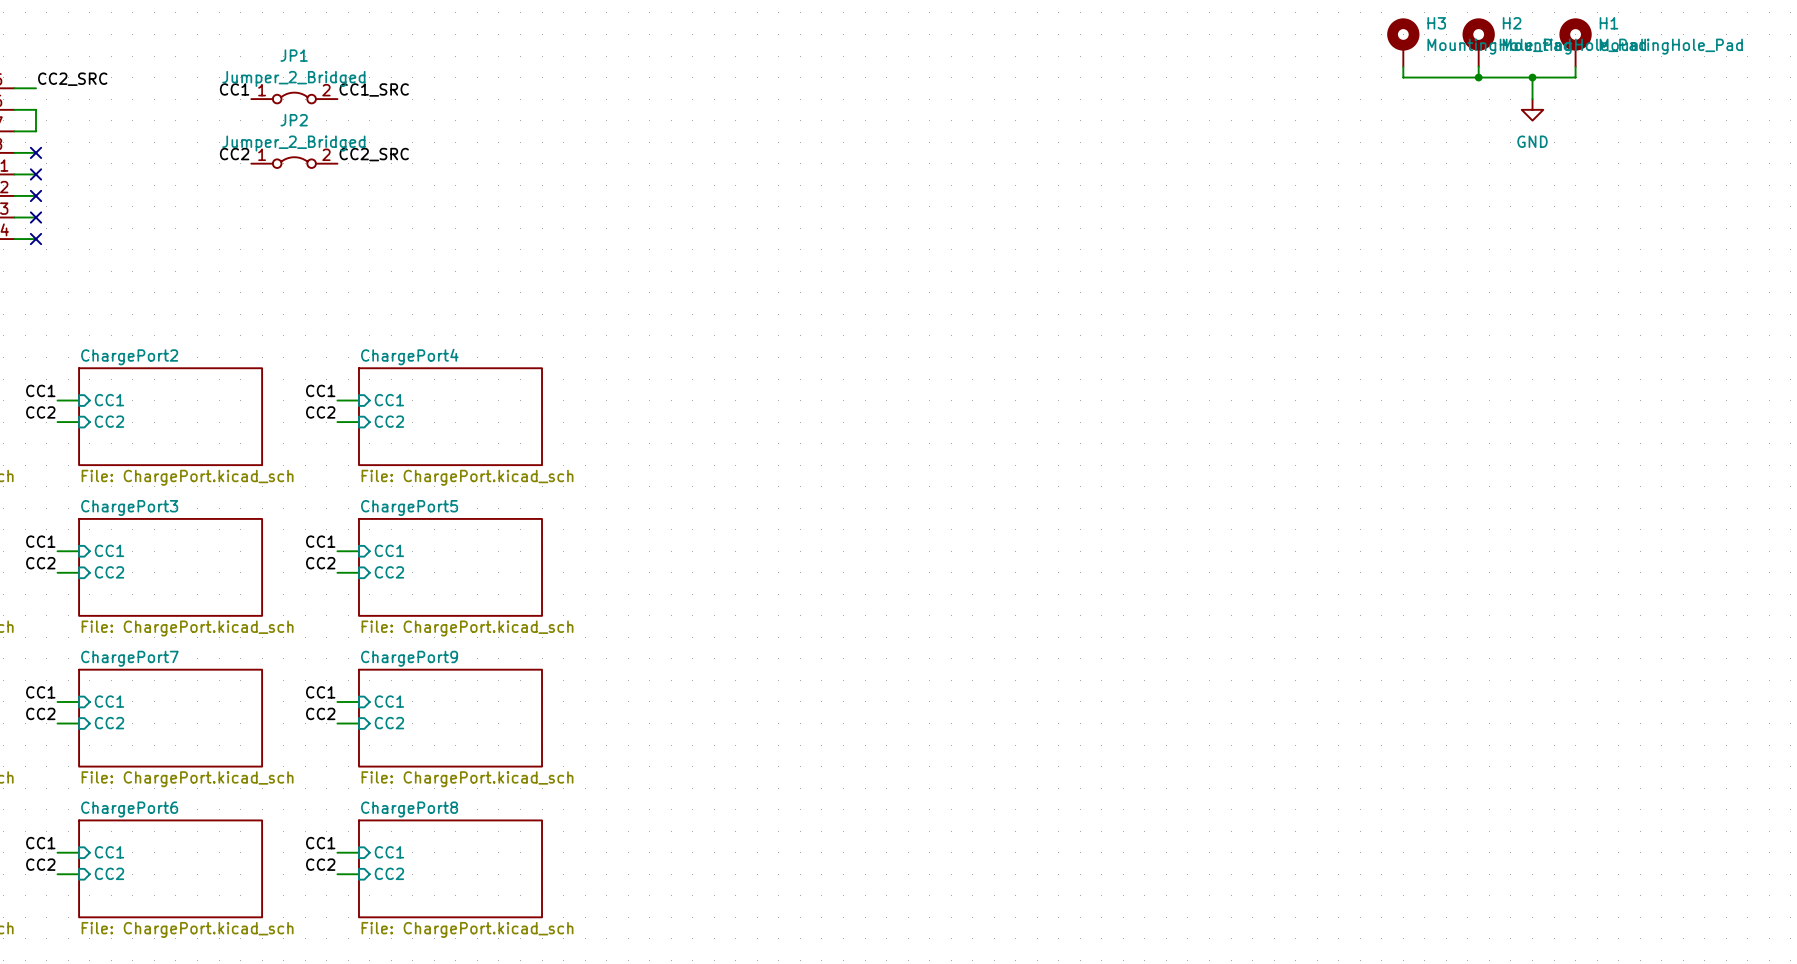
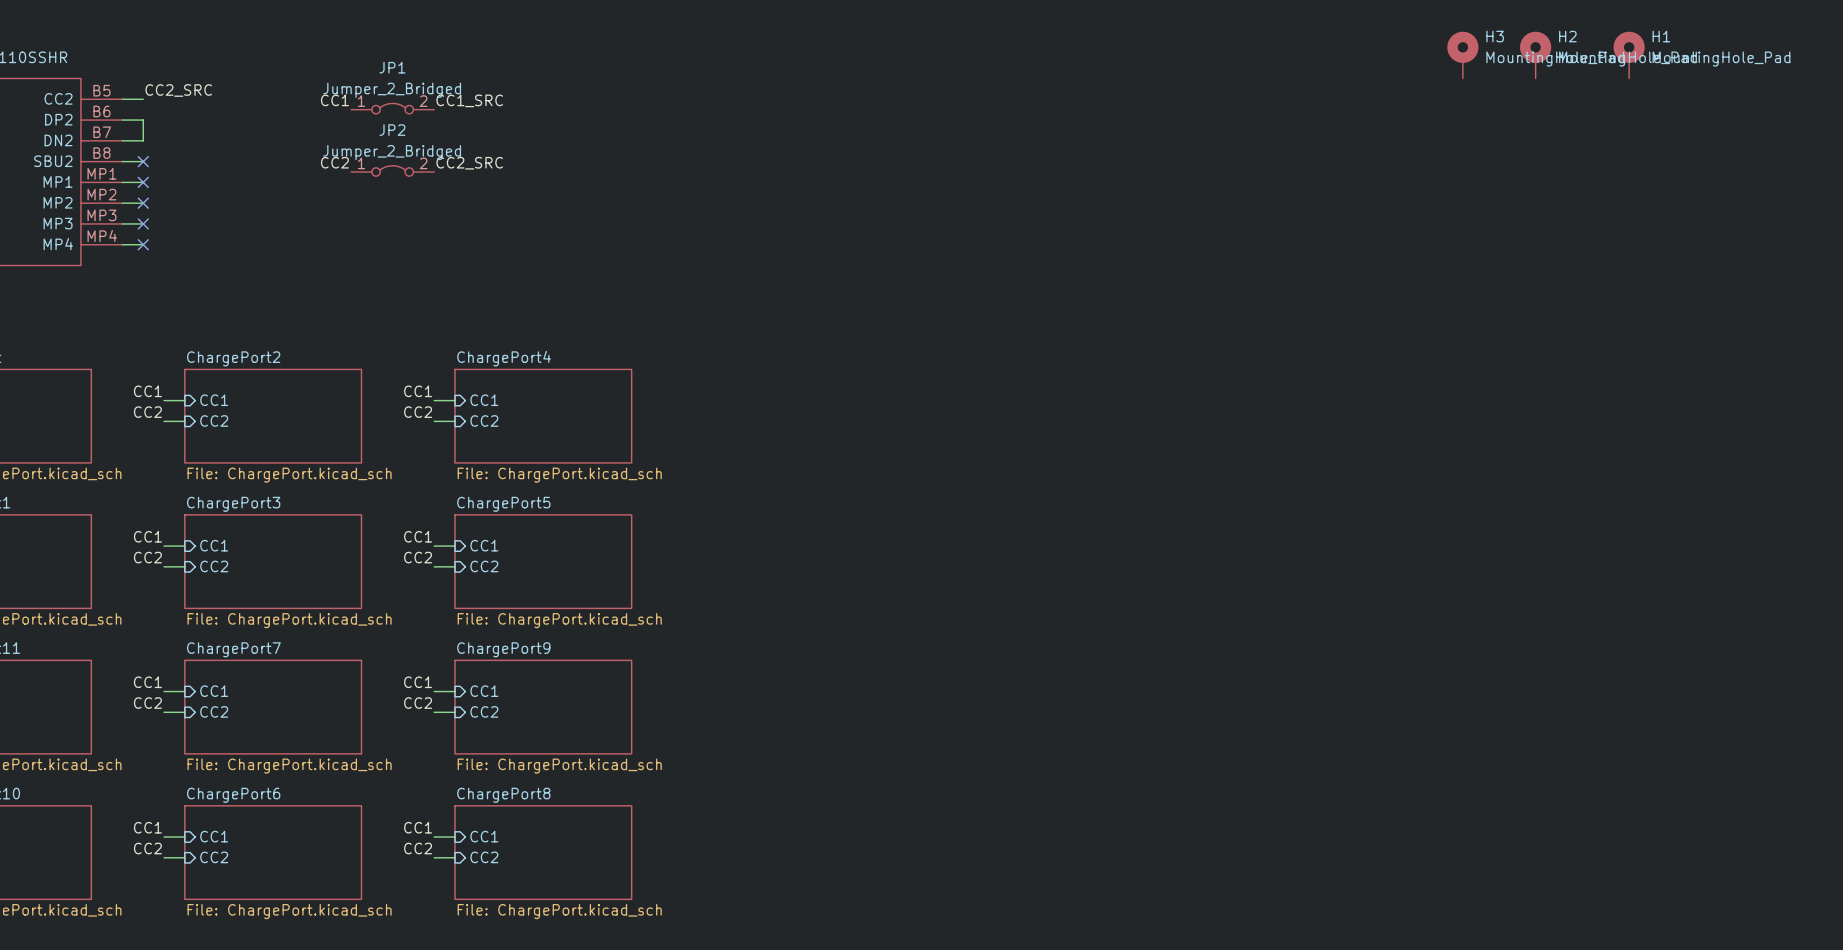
wire: (1403, 66) (1403, 77) (1575, 77) (1575, 66) -> none
wire: (1478, 66) (1478, 77) -> none
junction: (1478, 77) -> none
wire: (1532, 77) (1532, 99) -> none
junction: (1532, 77) -> none
power symbol: GND (1532, 109) -> none

